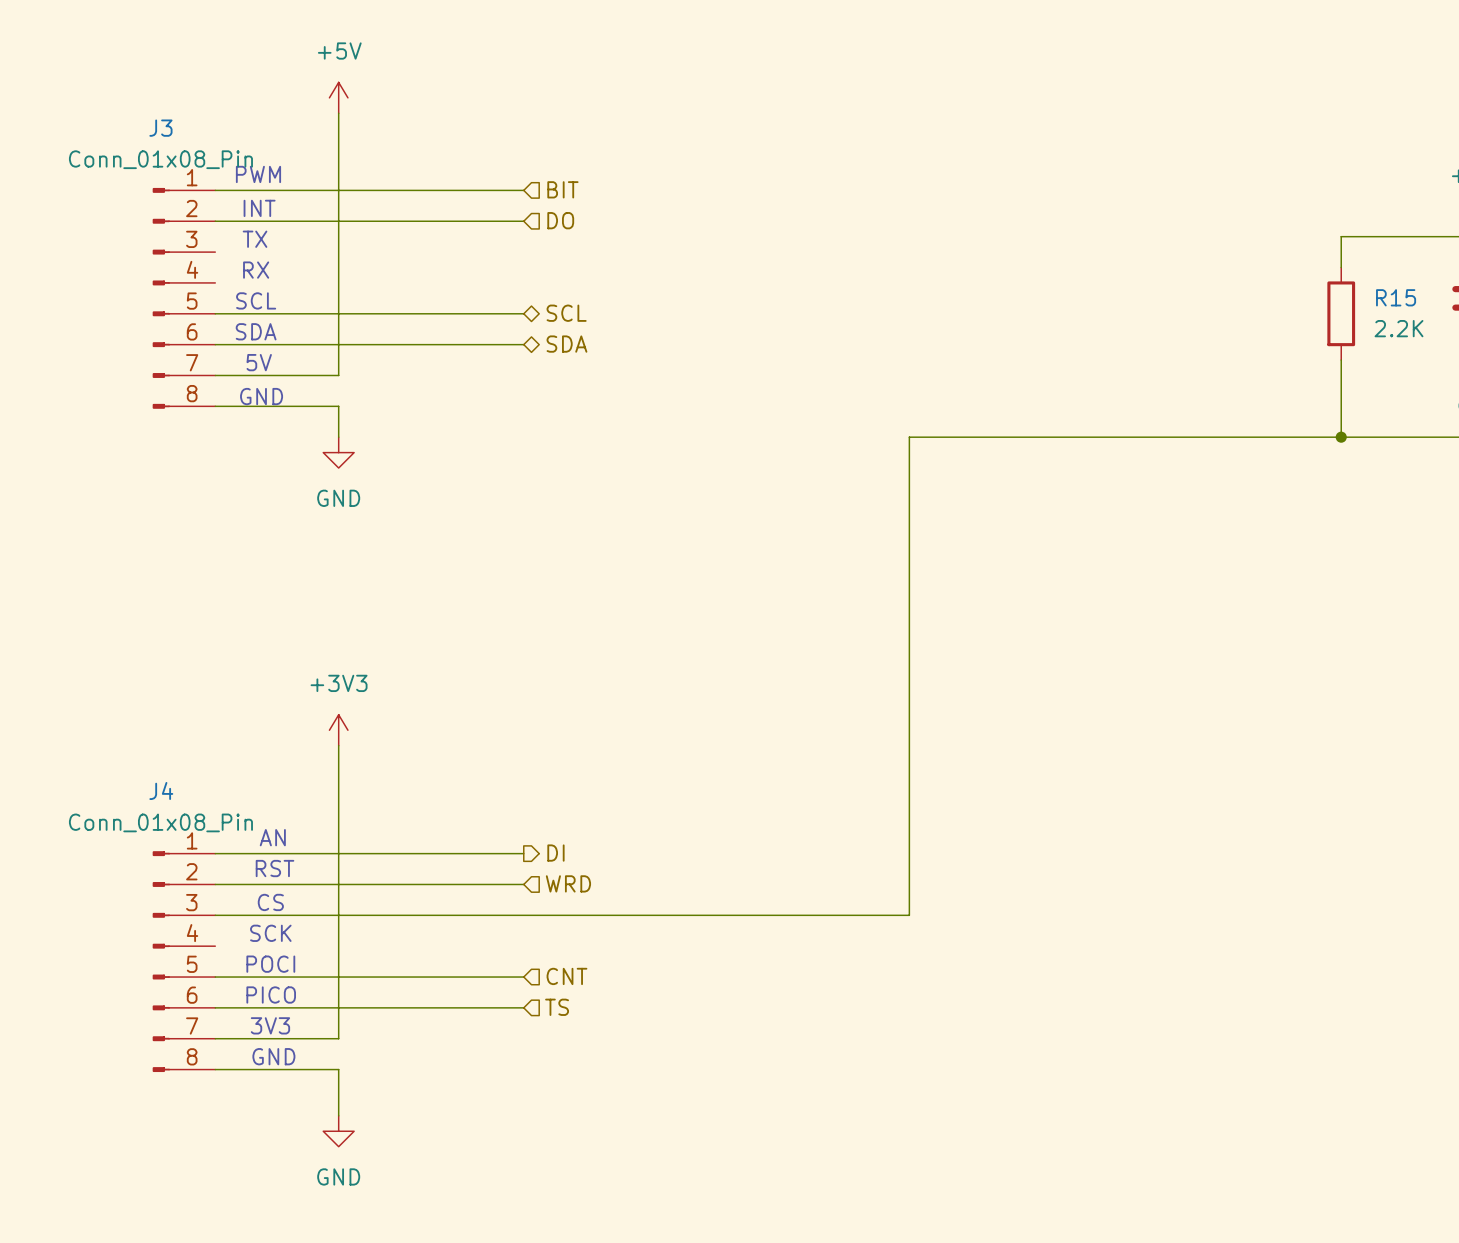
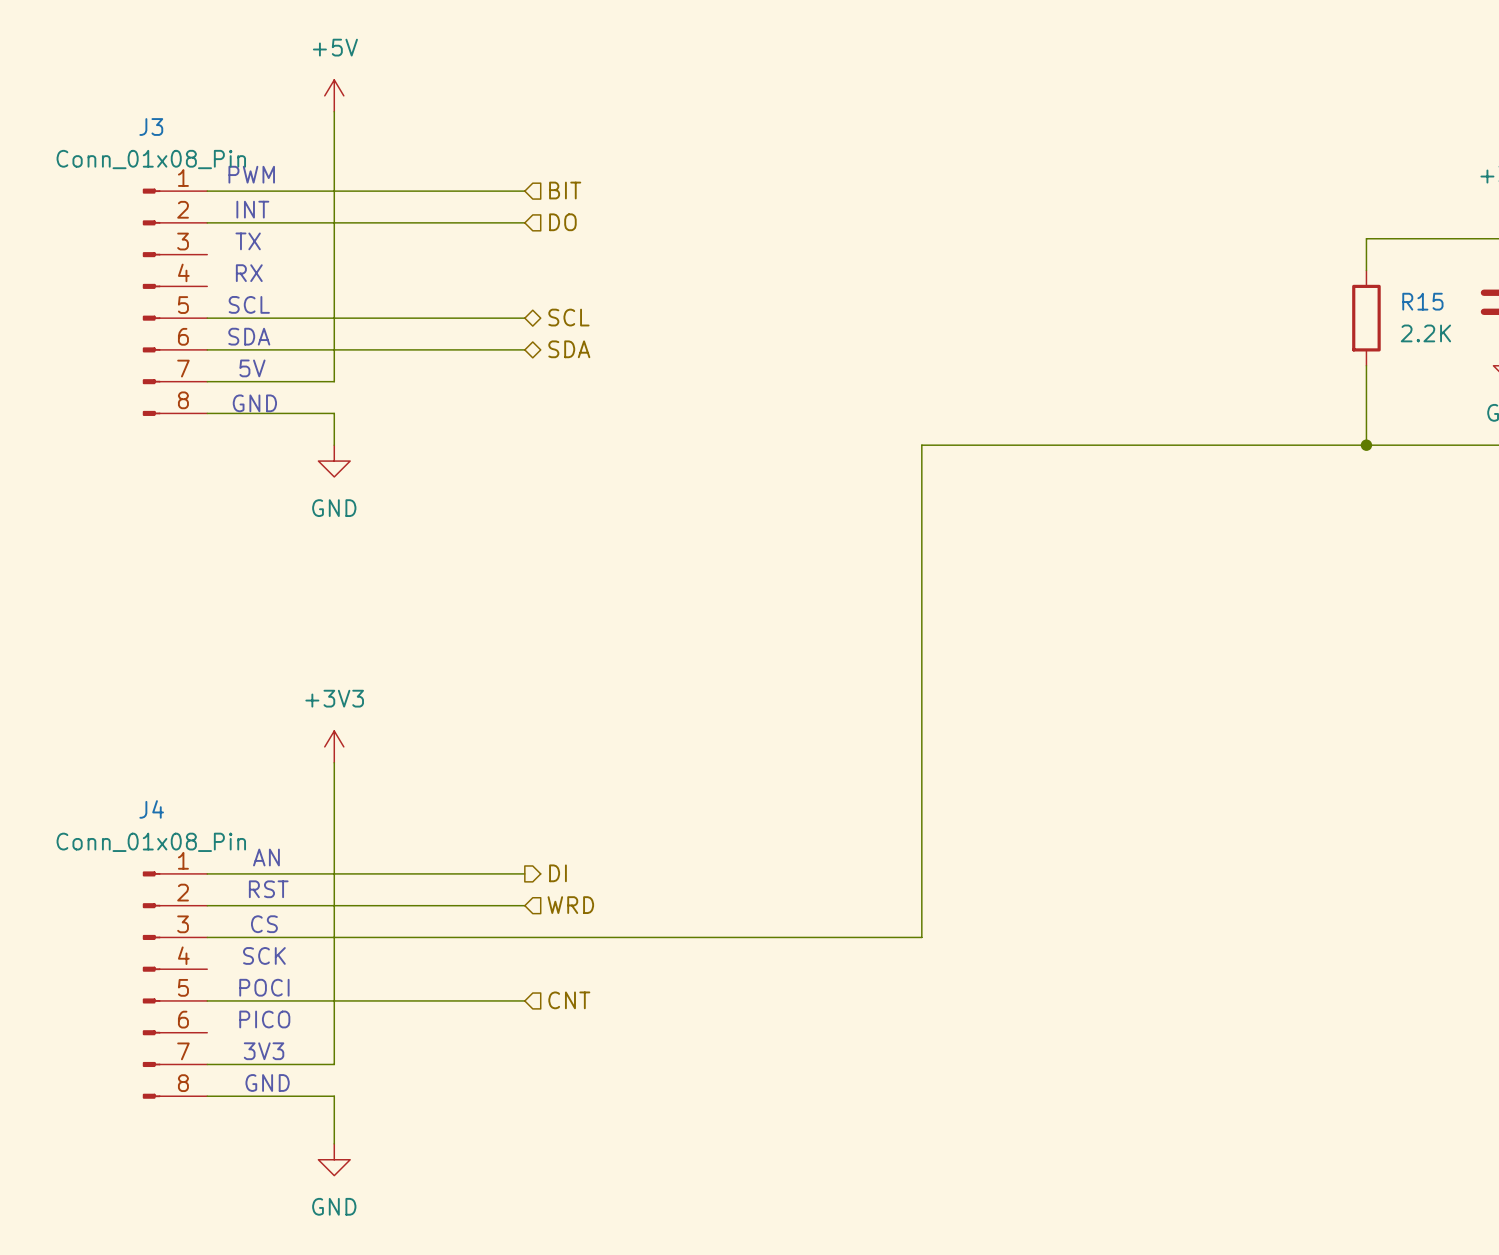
wire: (215, 1007) (523, 1007) -> none
hierarchical label: TS (557, 1007) -> none

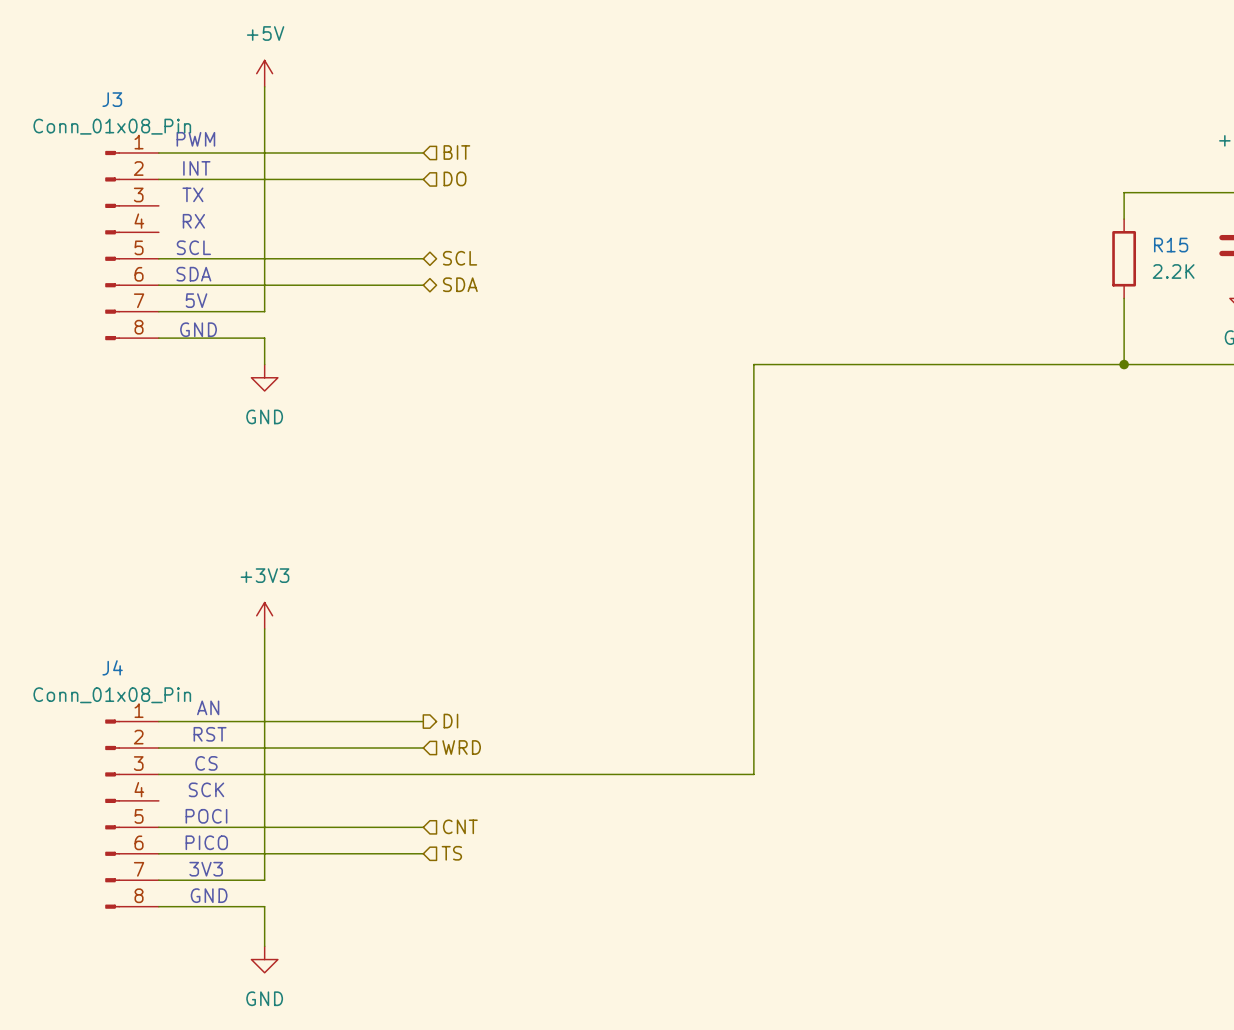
wire: none -> (158, 853) (423, 853)
hierarchical label: none -> TS (451, 853)

